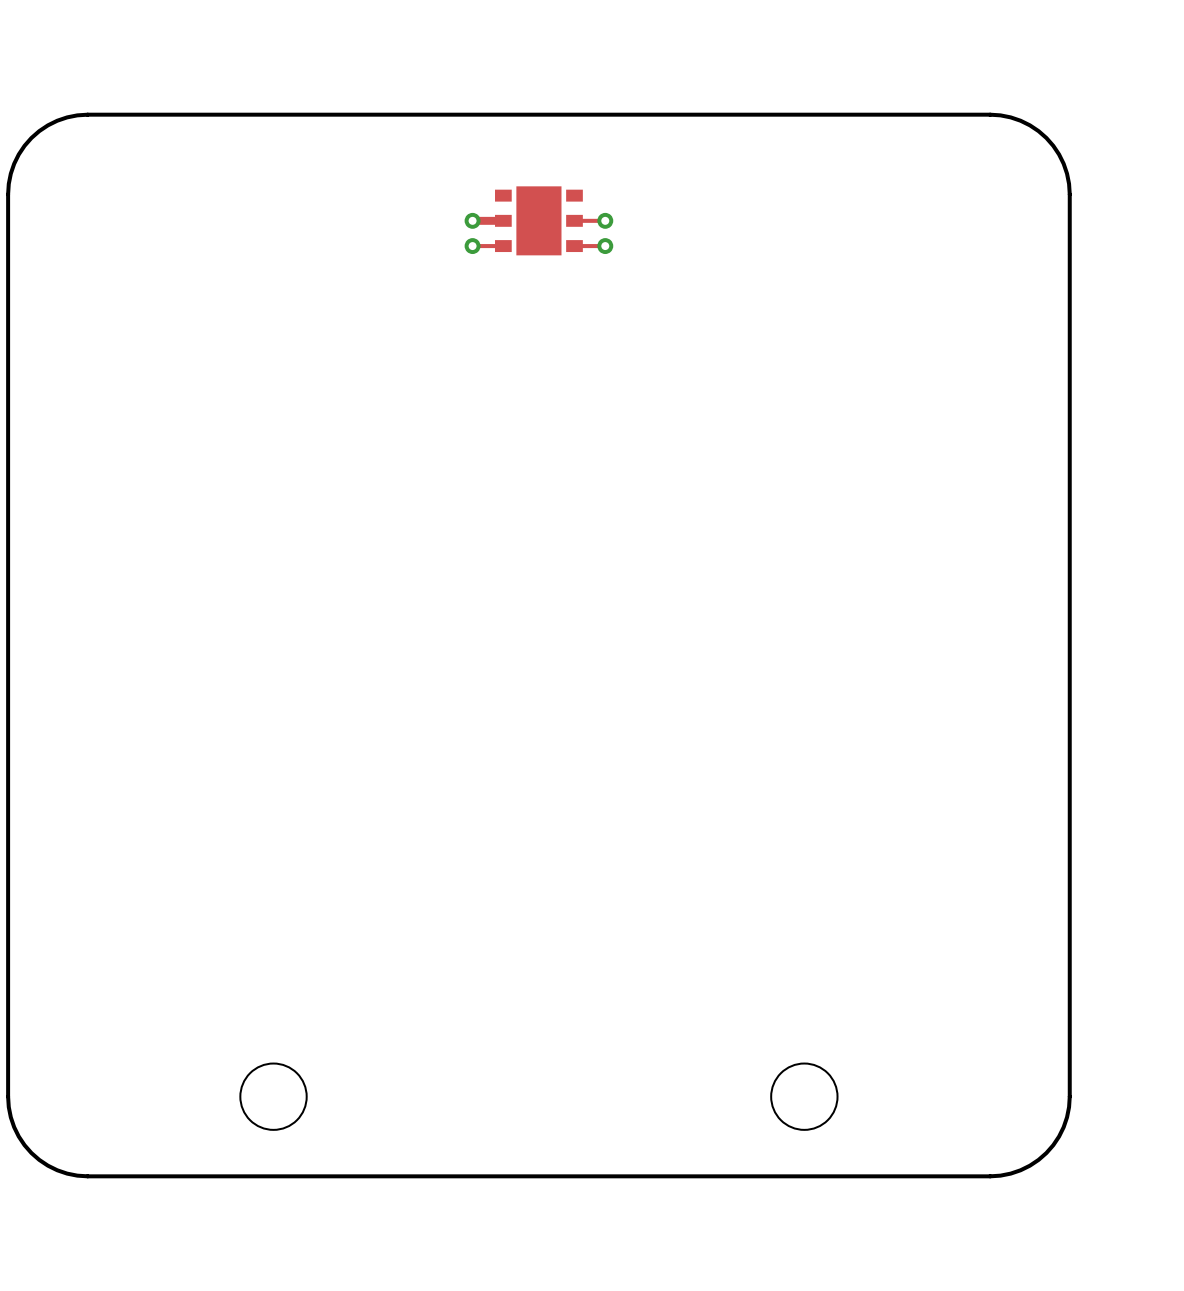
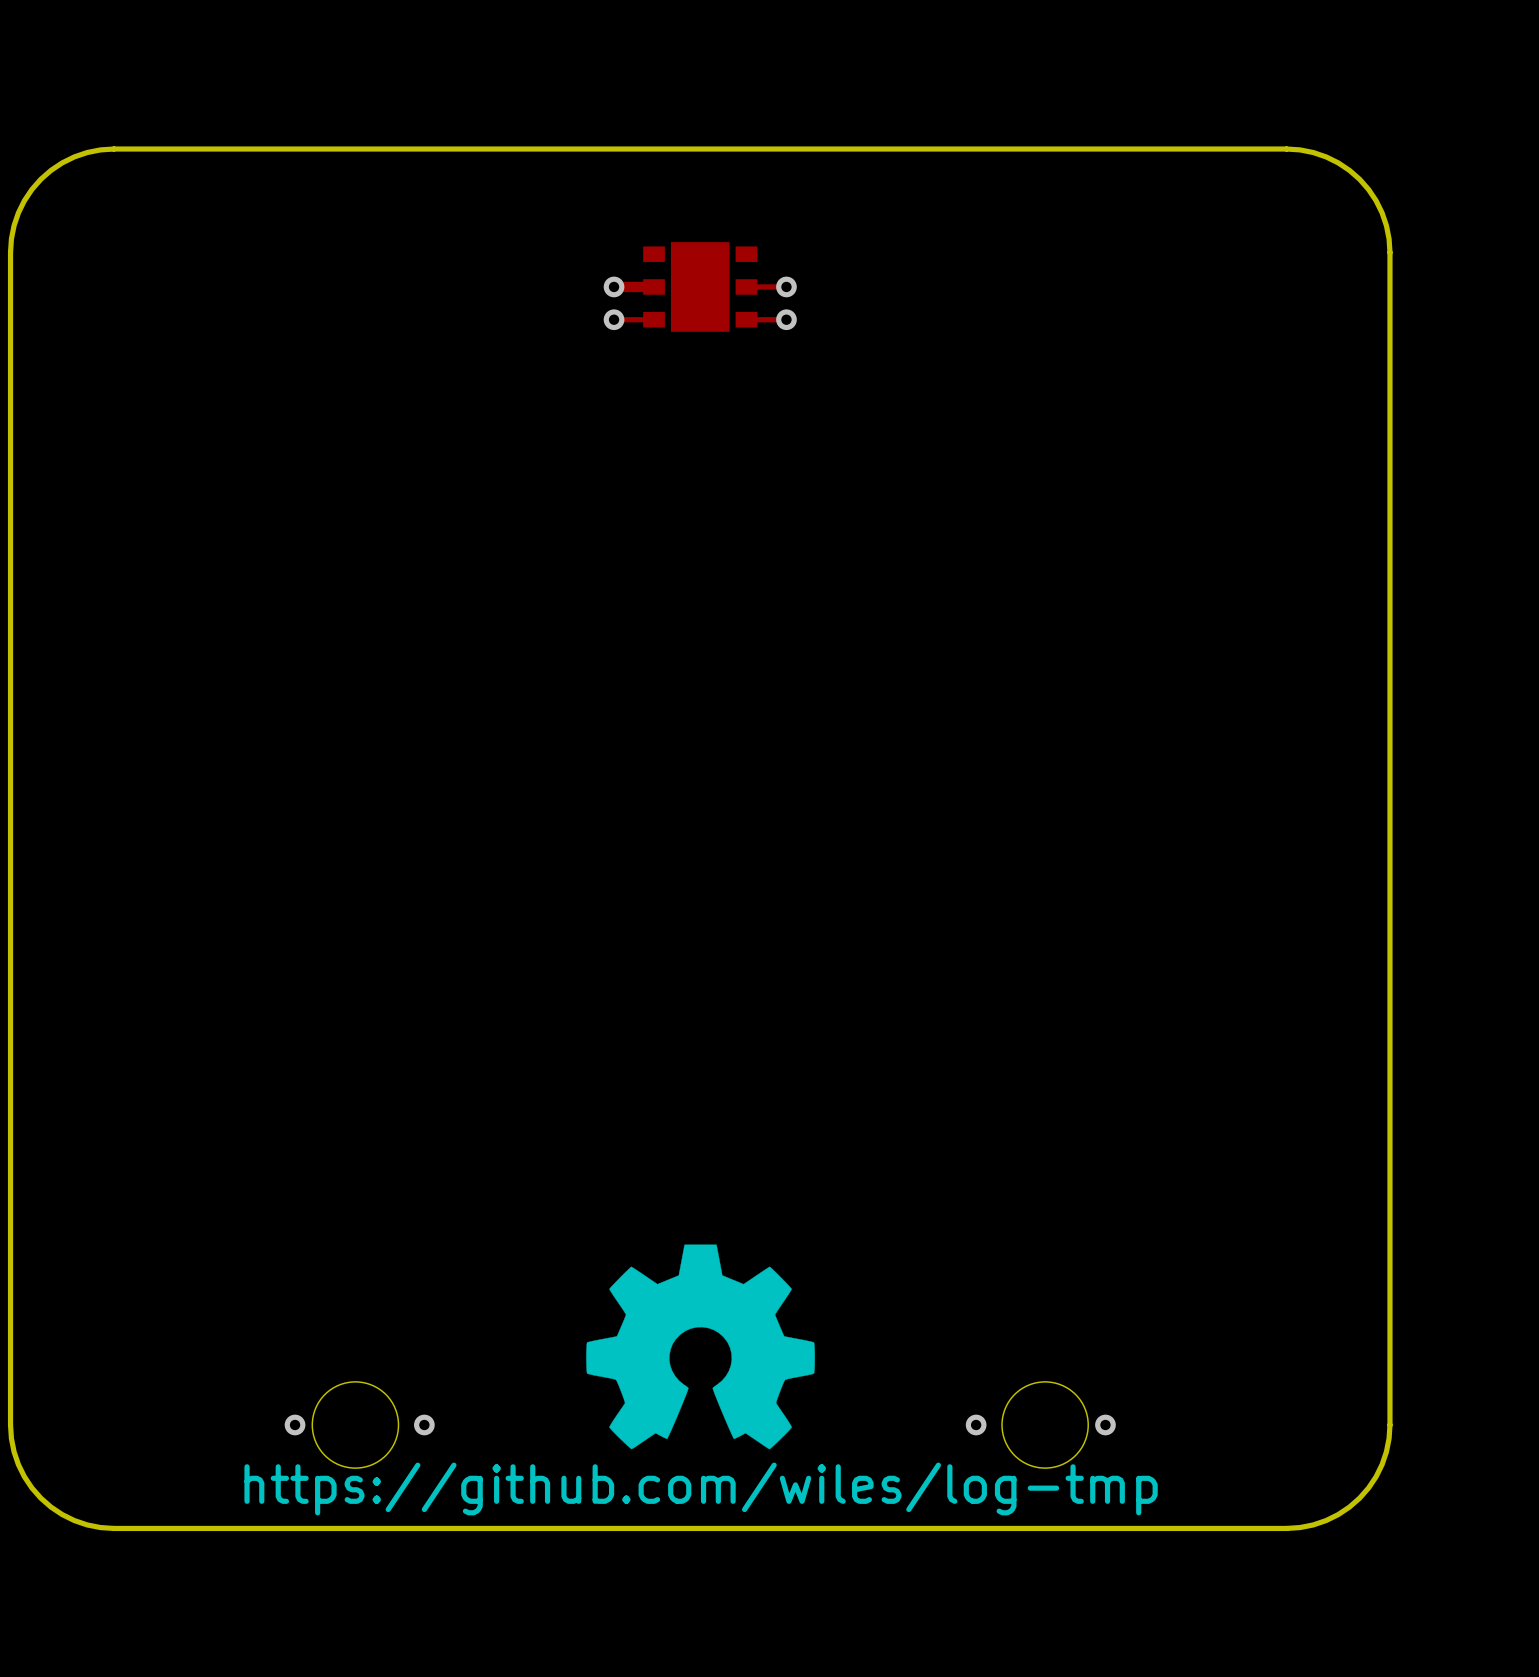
drawing: none -> [586, 1244, 815, 1450]
via: none -> (295, 1424)
via: none -> (424, 1424)
via: none -> (976, 1424)
via: none -> (1105, 1424)
text: none -> https://github.com/wiles/log-tmp (701, 1488)

